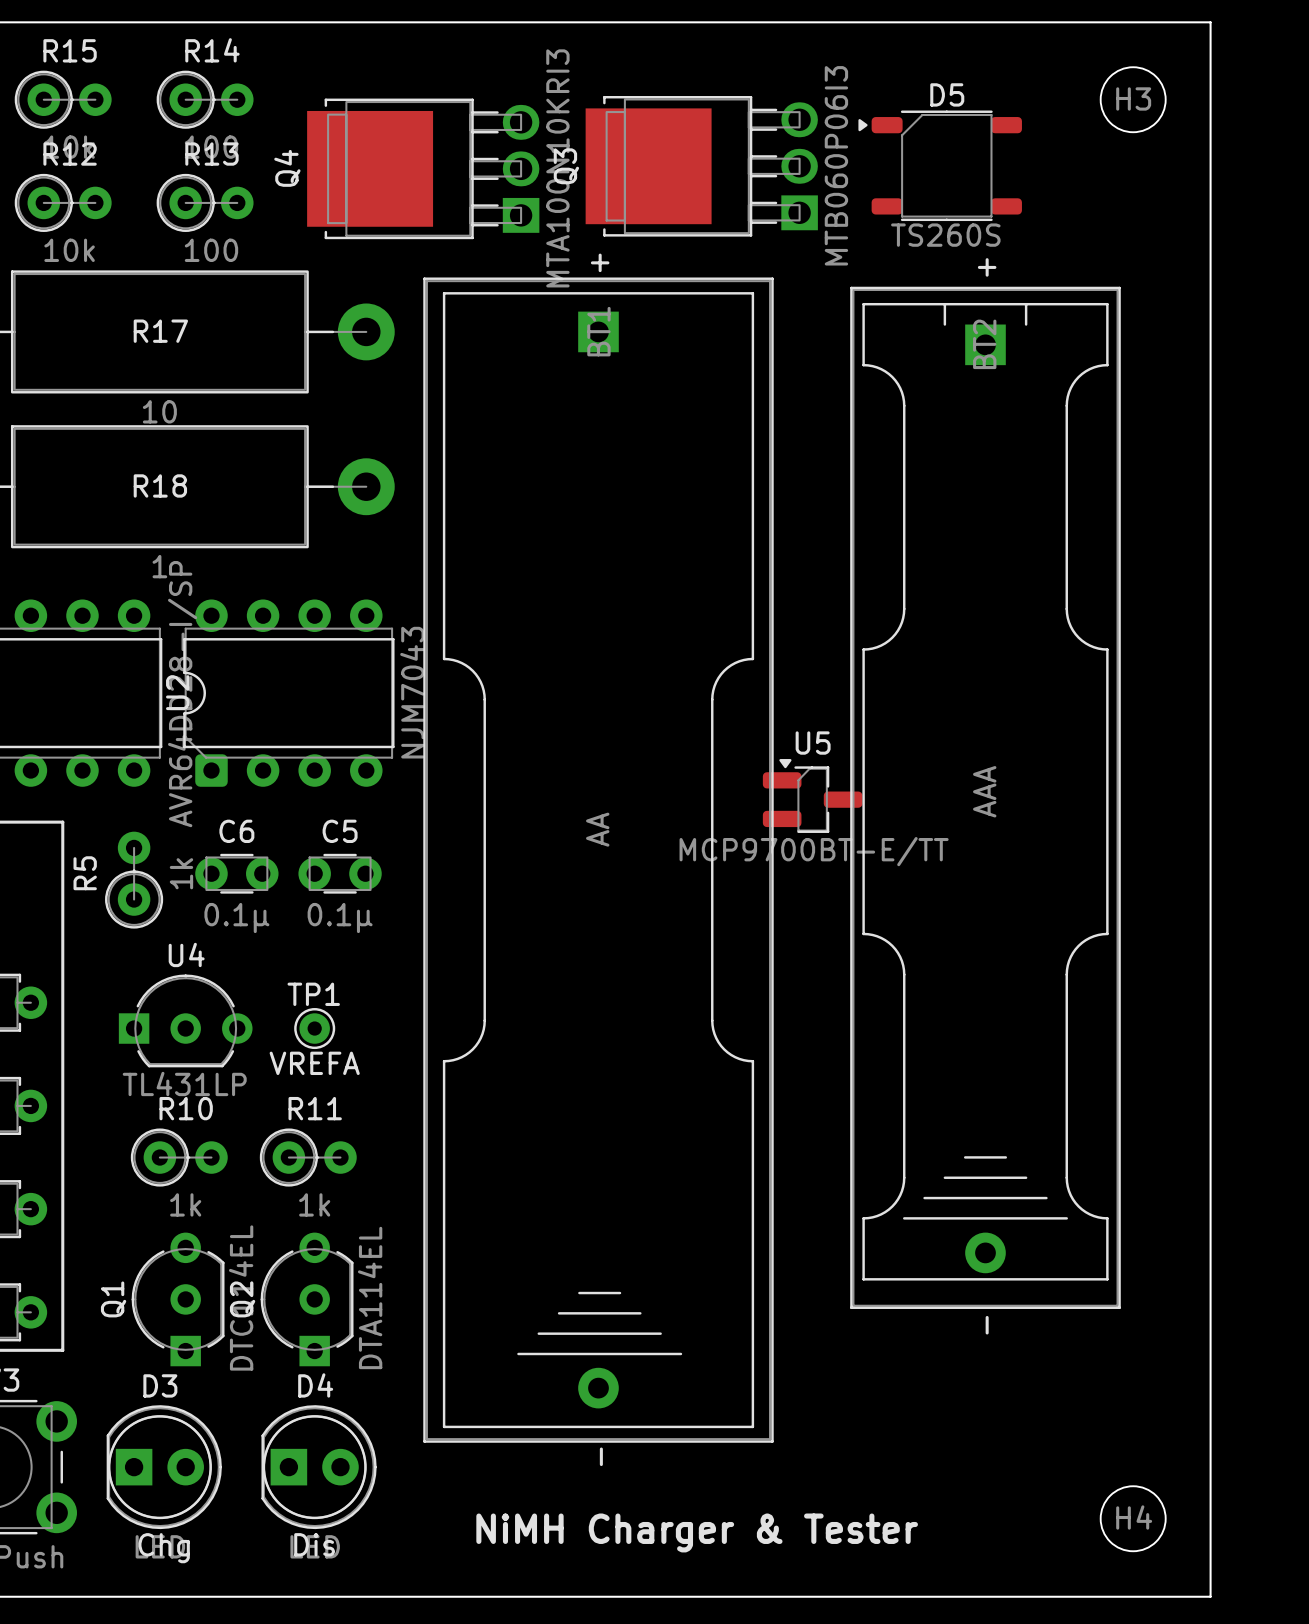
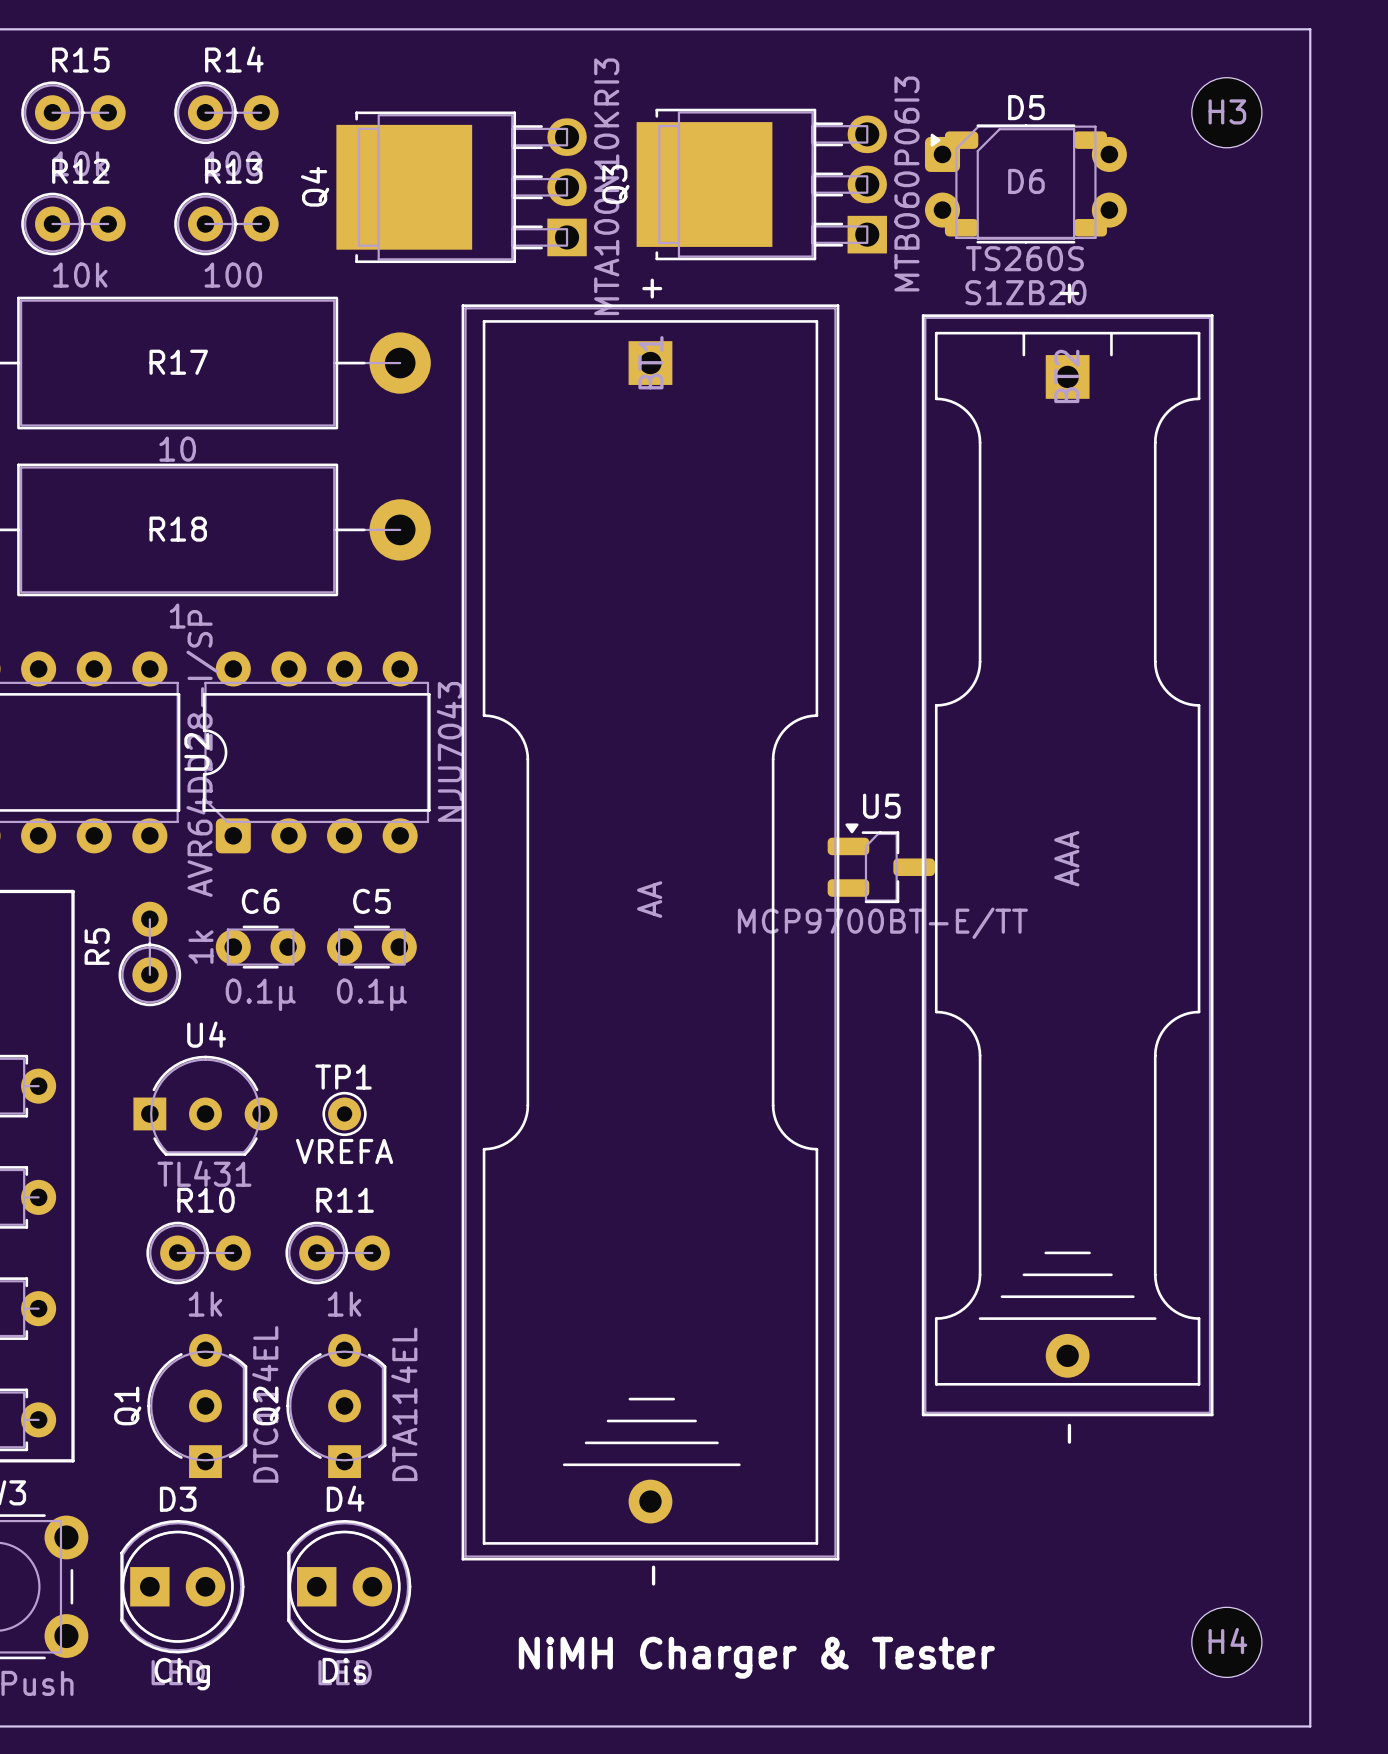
D6: none -> S1ZB20 (1025, 182)
U2 value: NJM7043 (412, 692) -> NJU7043 (449, 751)
U4 value: TL431LP (184, 1083) -> TL431 (204, 1173)

